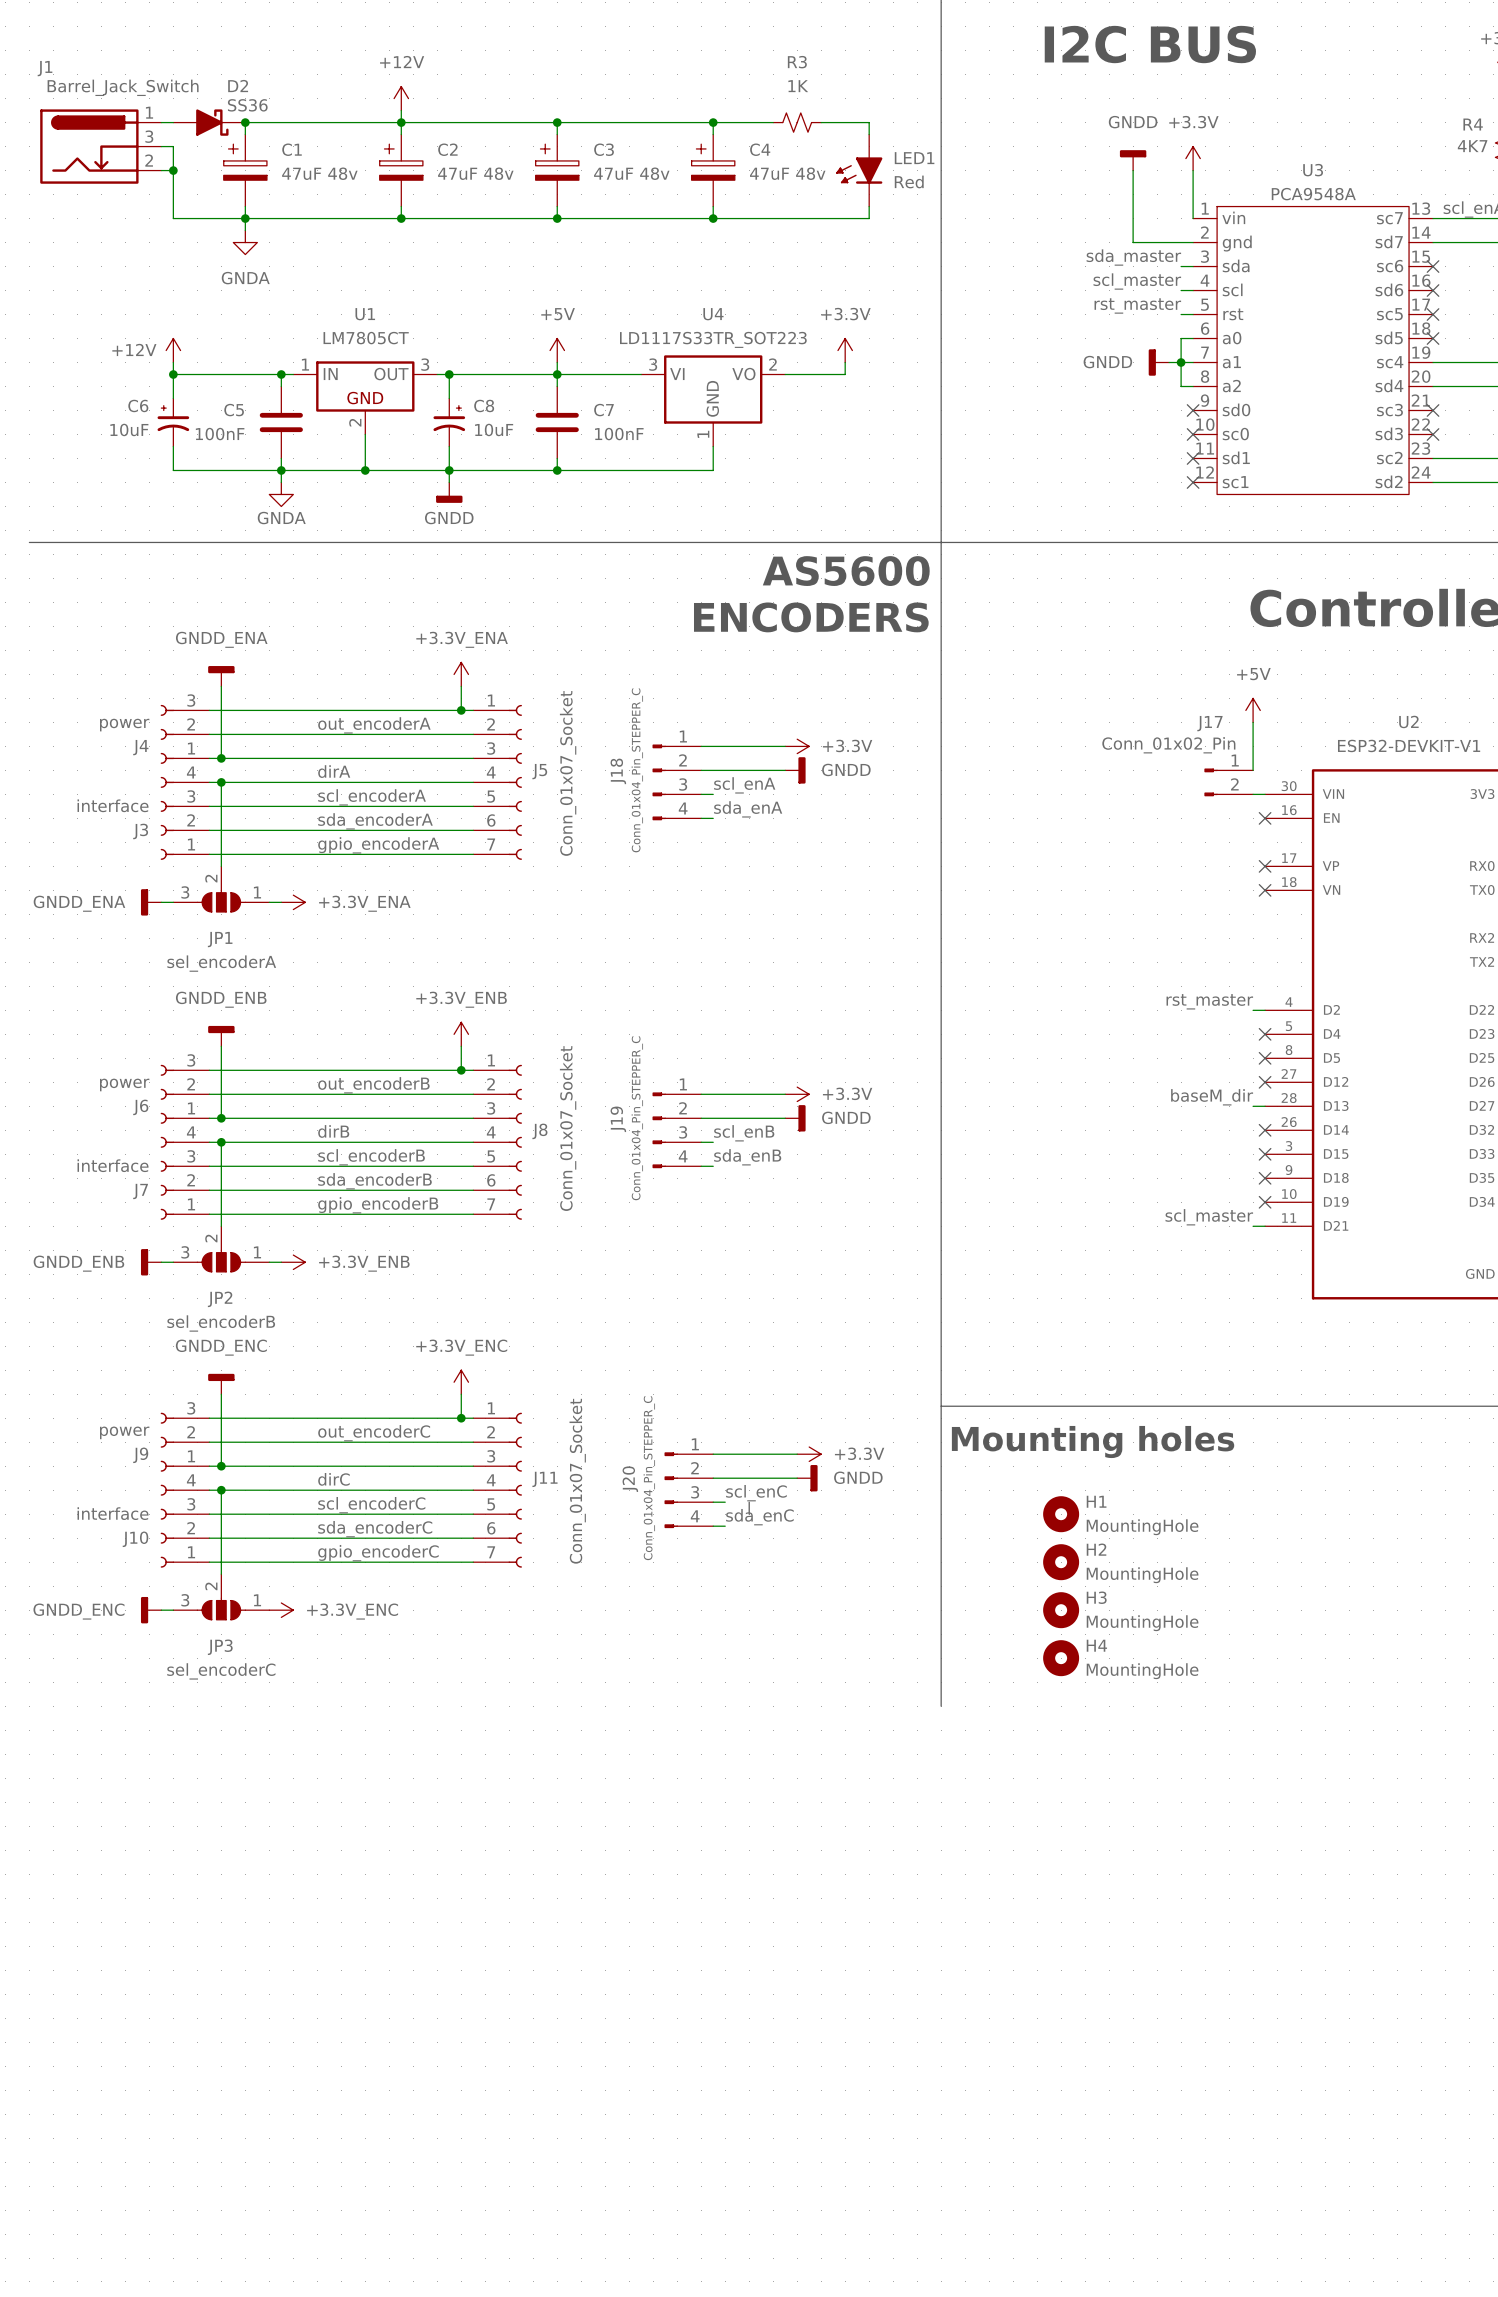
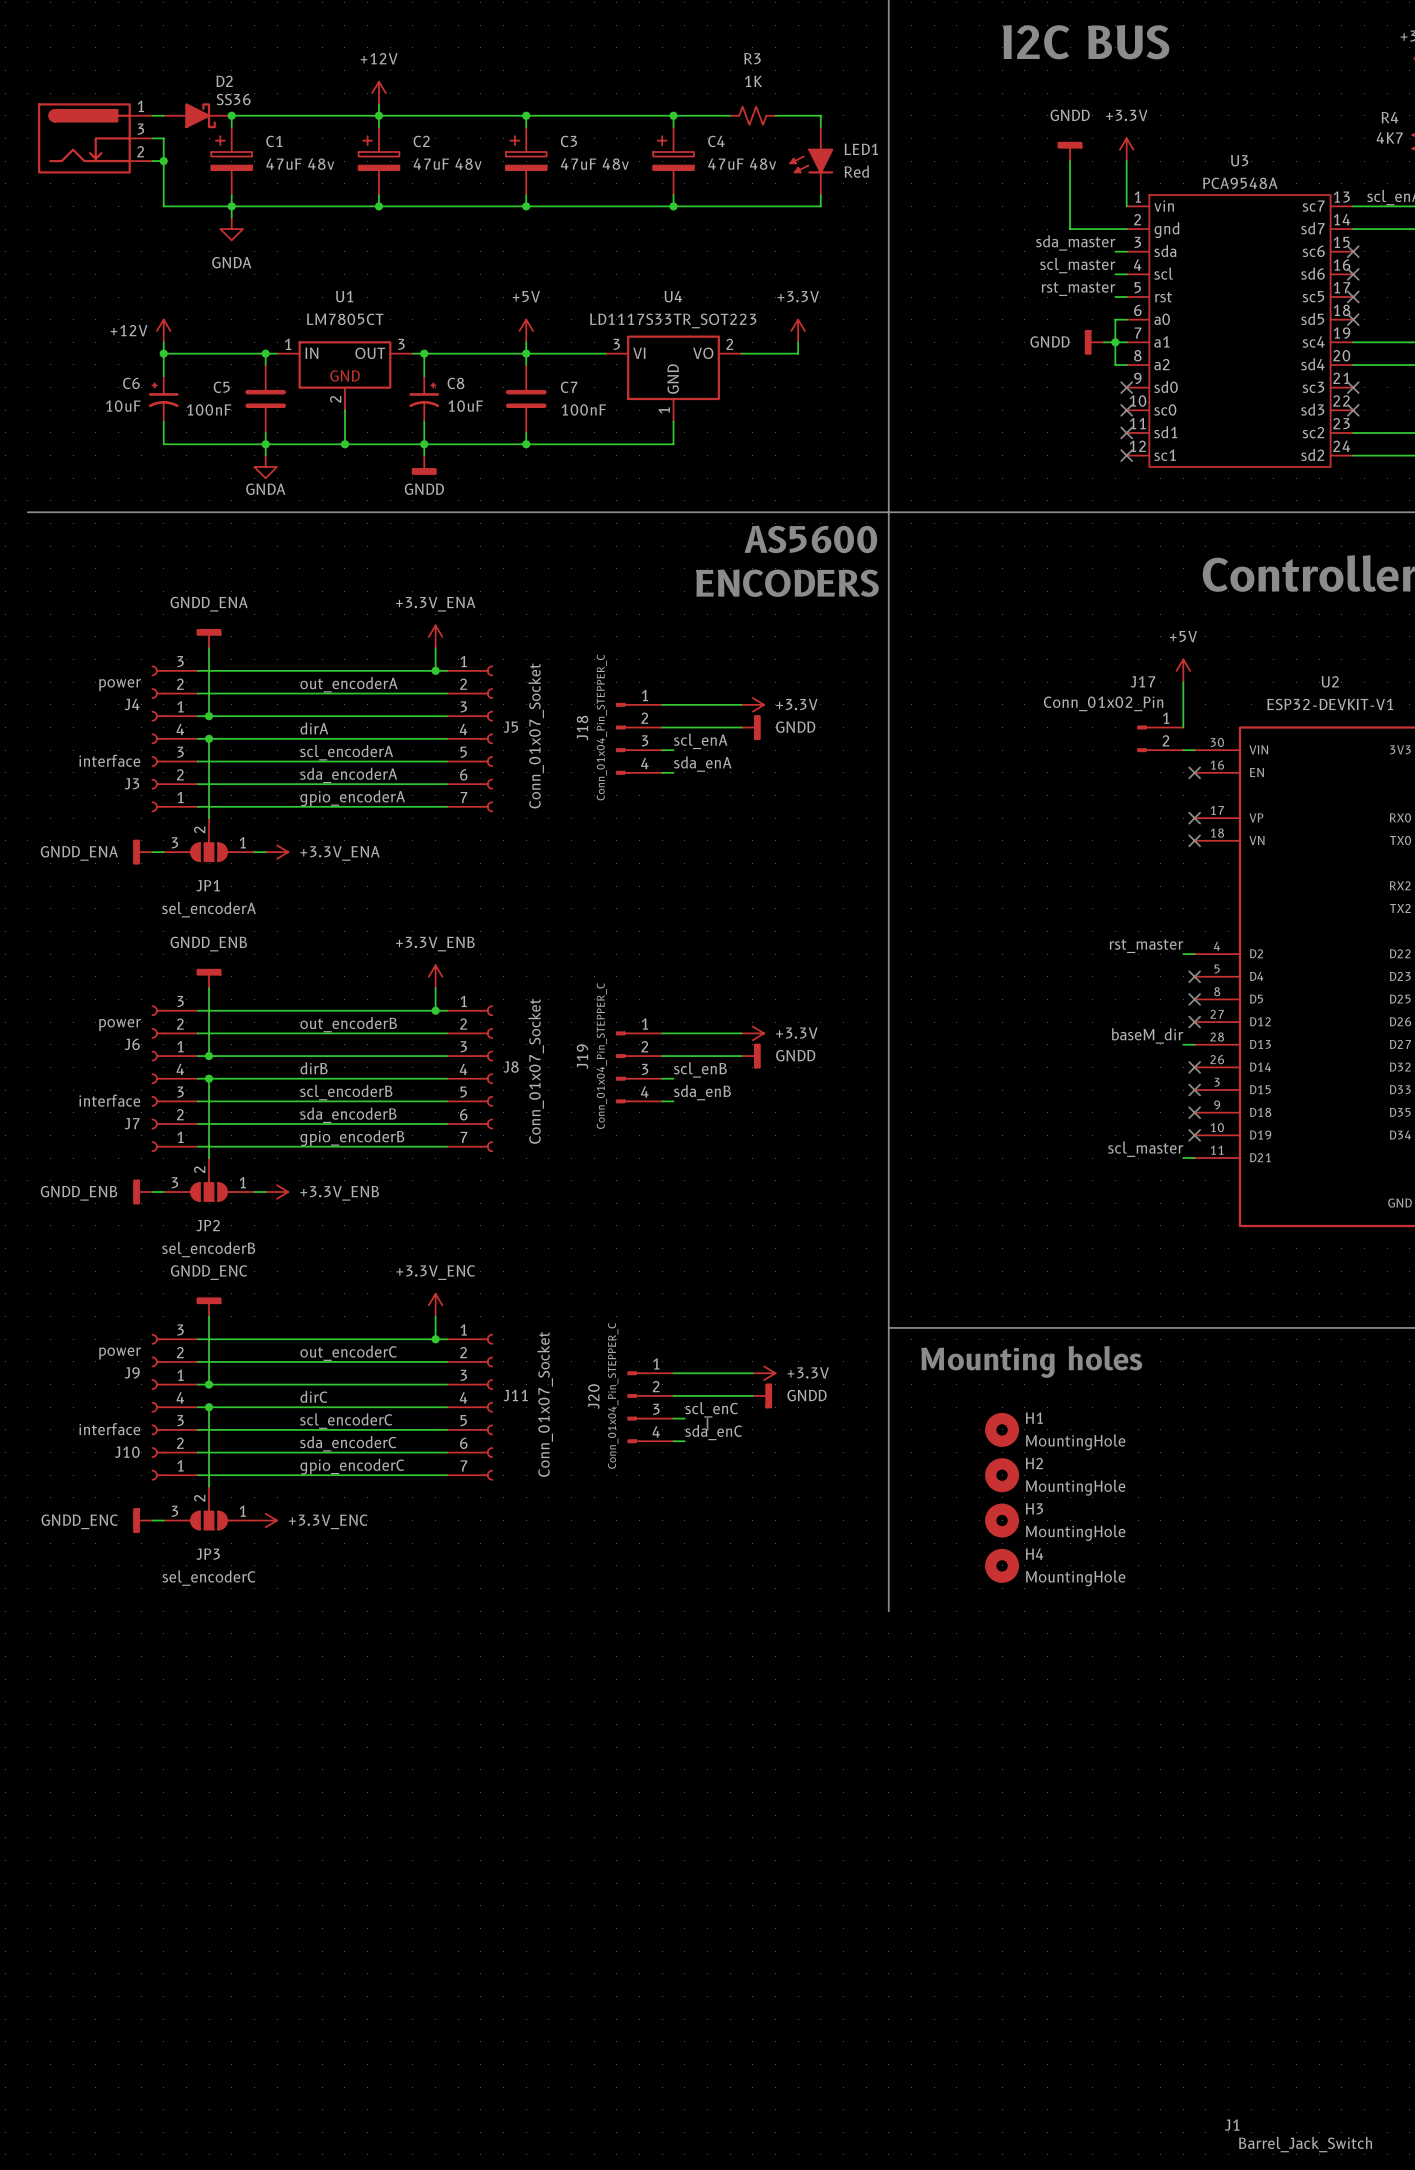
J1 name position: J1 (45, 68) -> J1 (1232, 2125)
J1 value position: Barrel_Jack_Switch (123, 87) -> Barrel_Jack_Switch (1305, 2144)

